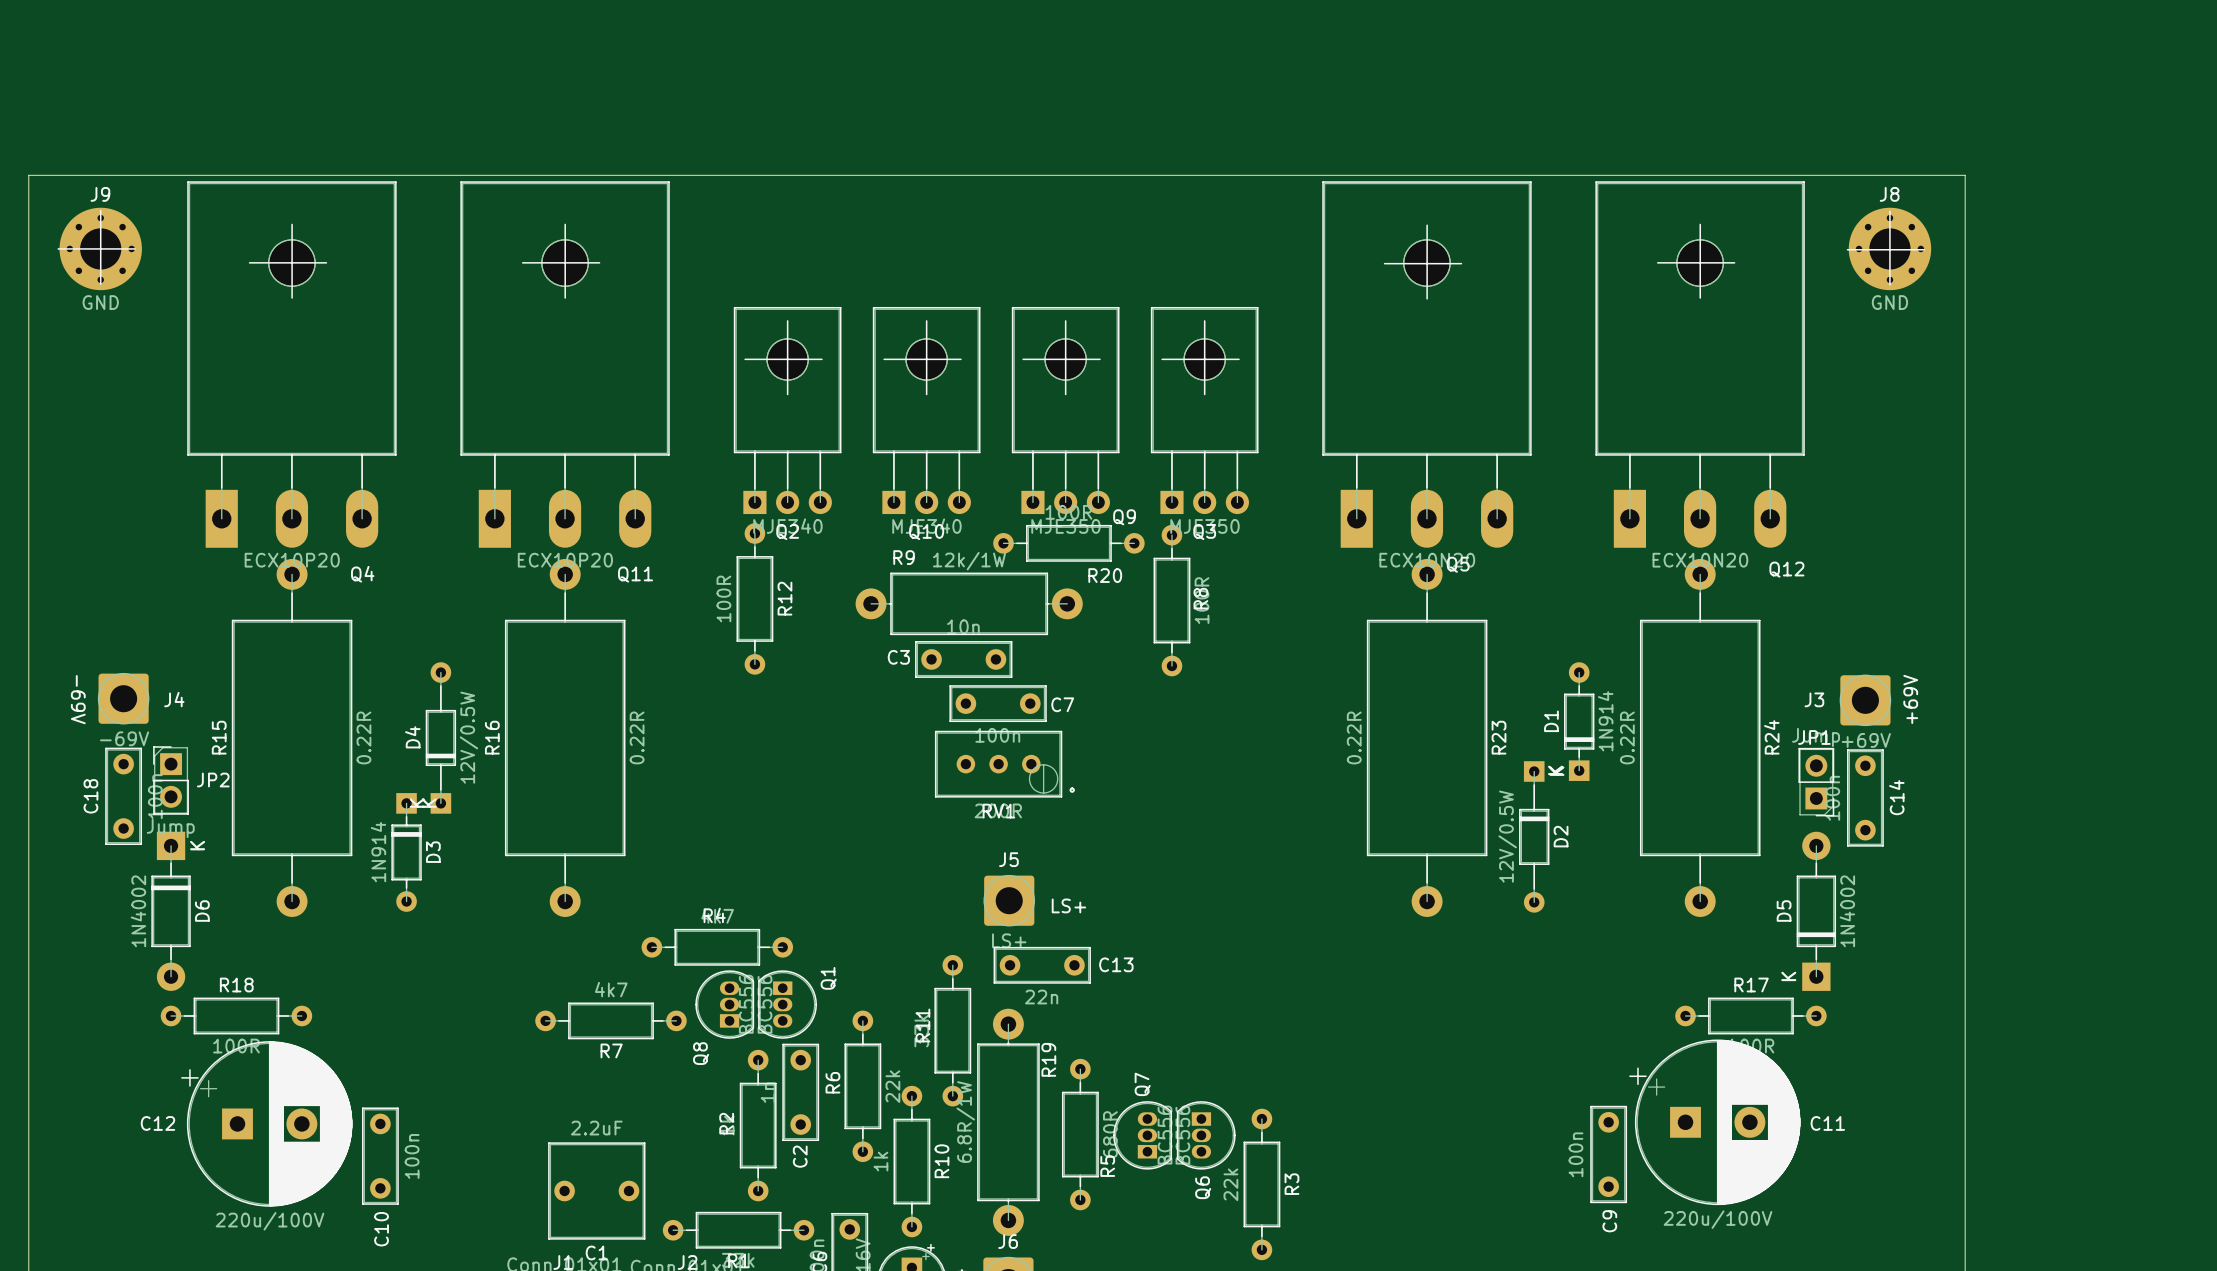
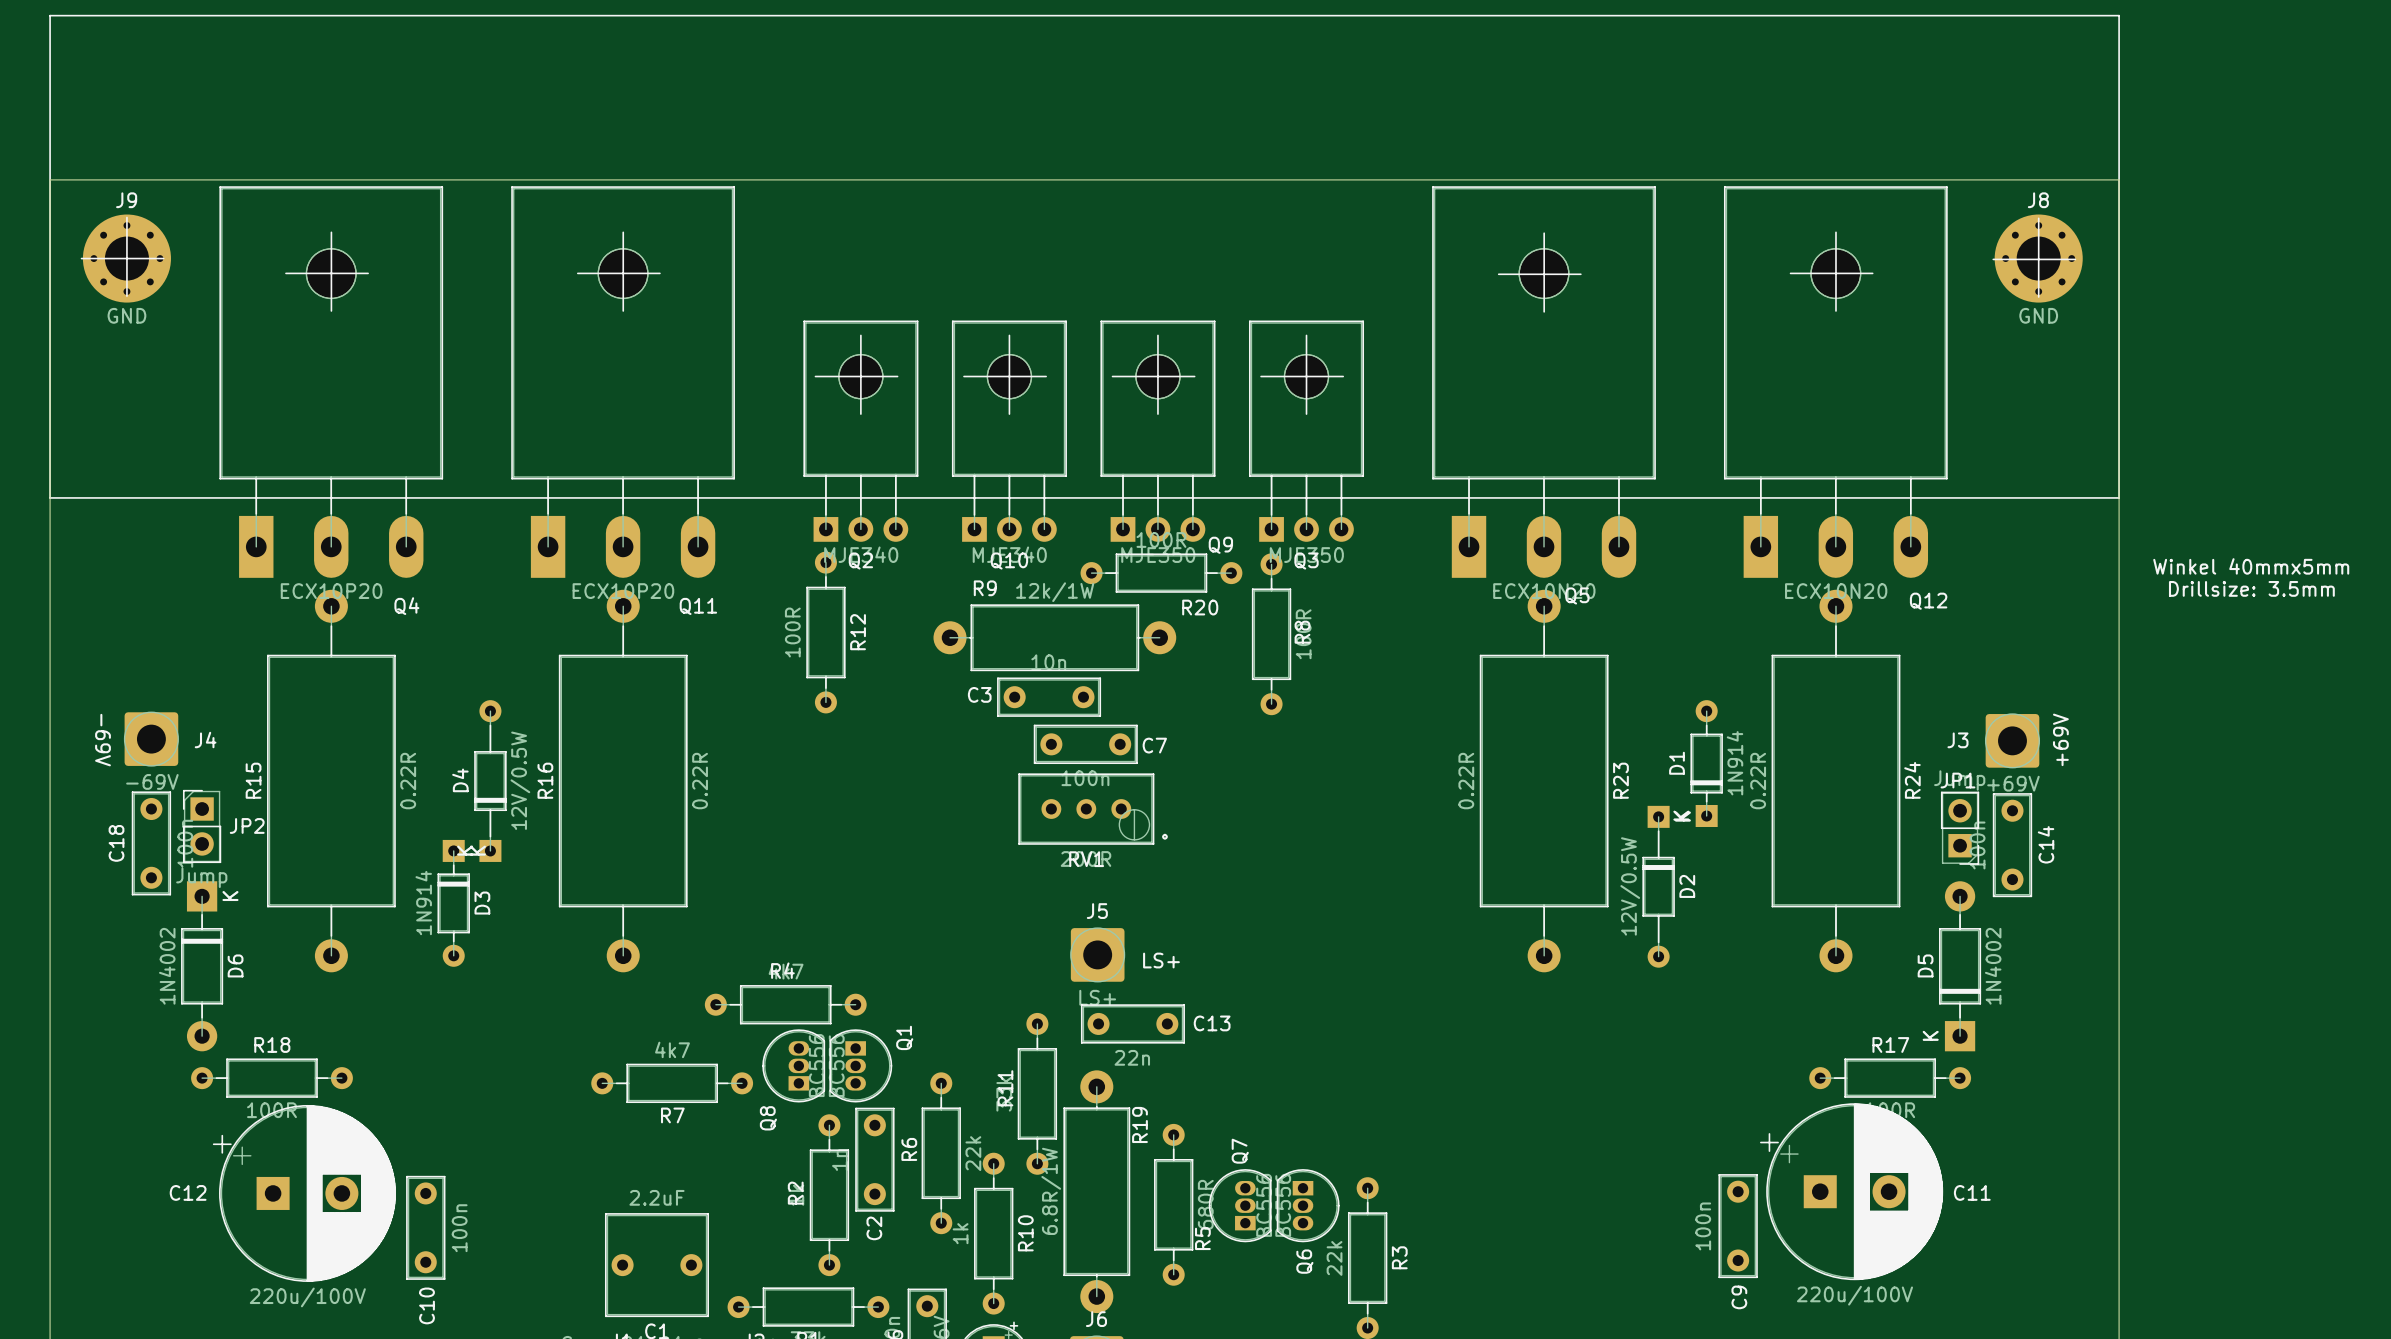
line: none -> (50, 15) (50, 497) (2119, 497) (2119, 15) (50, 15)
text: none -> Winkel 40mmx5mm (2251, 566)
text: none -> Drillsize: 3.5mm (2251, 588)

